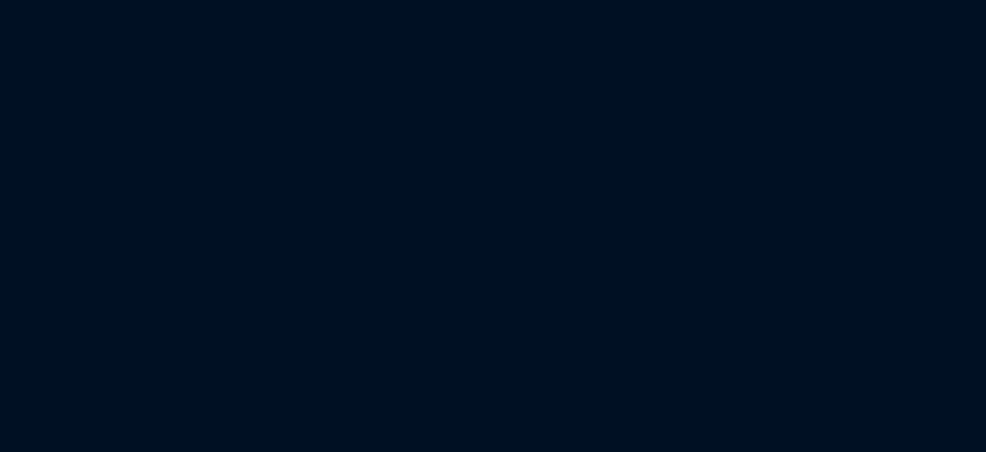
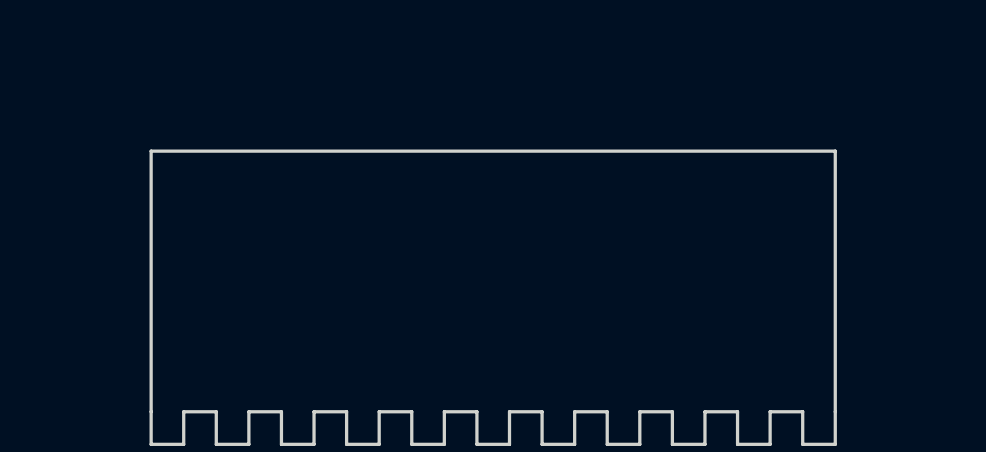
board edge: none -> (835, 151) (835, 444) (802, 444) (802, 411) (770, 411) (770, 444) (737, 444) (737, 411) (704, 411) (704, 444) (672, 444) (672, 411) (639, 411) (639, 444) (607, 444) (607, 411) (574, 411) (574, 444) (542, 444) (542, 411) (509, 411) (509, 444) (476, 444) (476, 411) (444, 411) (444, 444) (411, 444) (411, 411) (379, 411) (379, 444) (346, 444) (346, 411) (314, 411) (314, 444) (281, 444) (281, 411) (248, 411) (248, 444) (216, 444) (216, 411) (183, 411) (183, 444) (151, 444) (151, 151) (835, 151)

